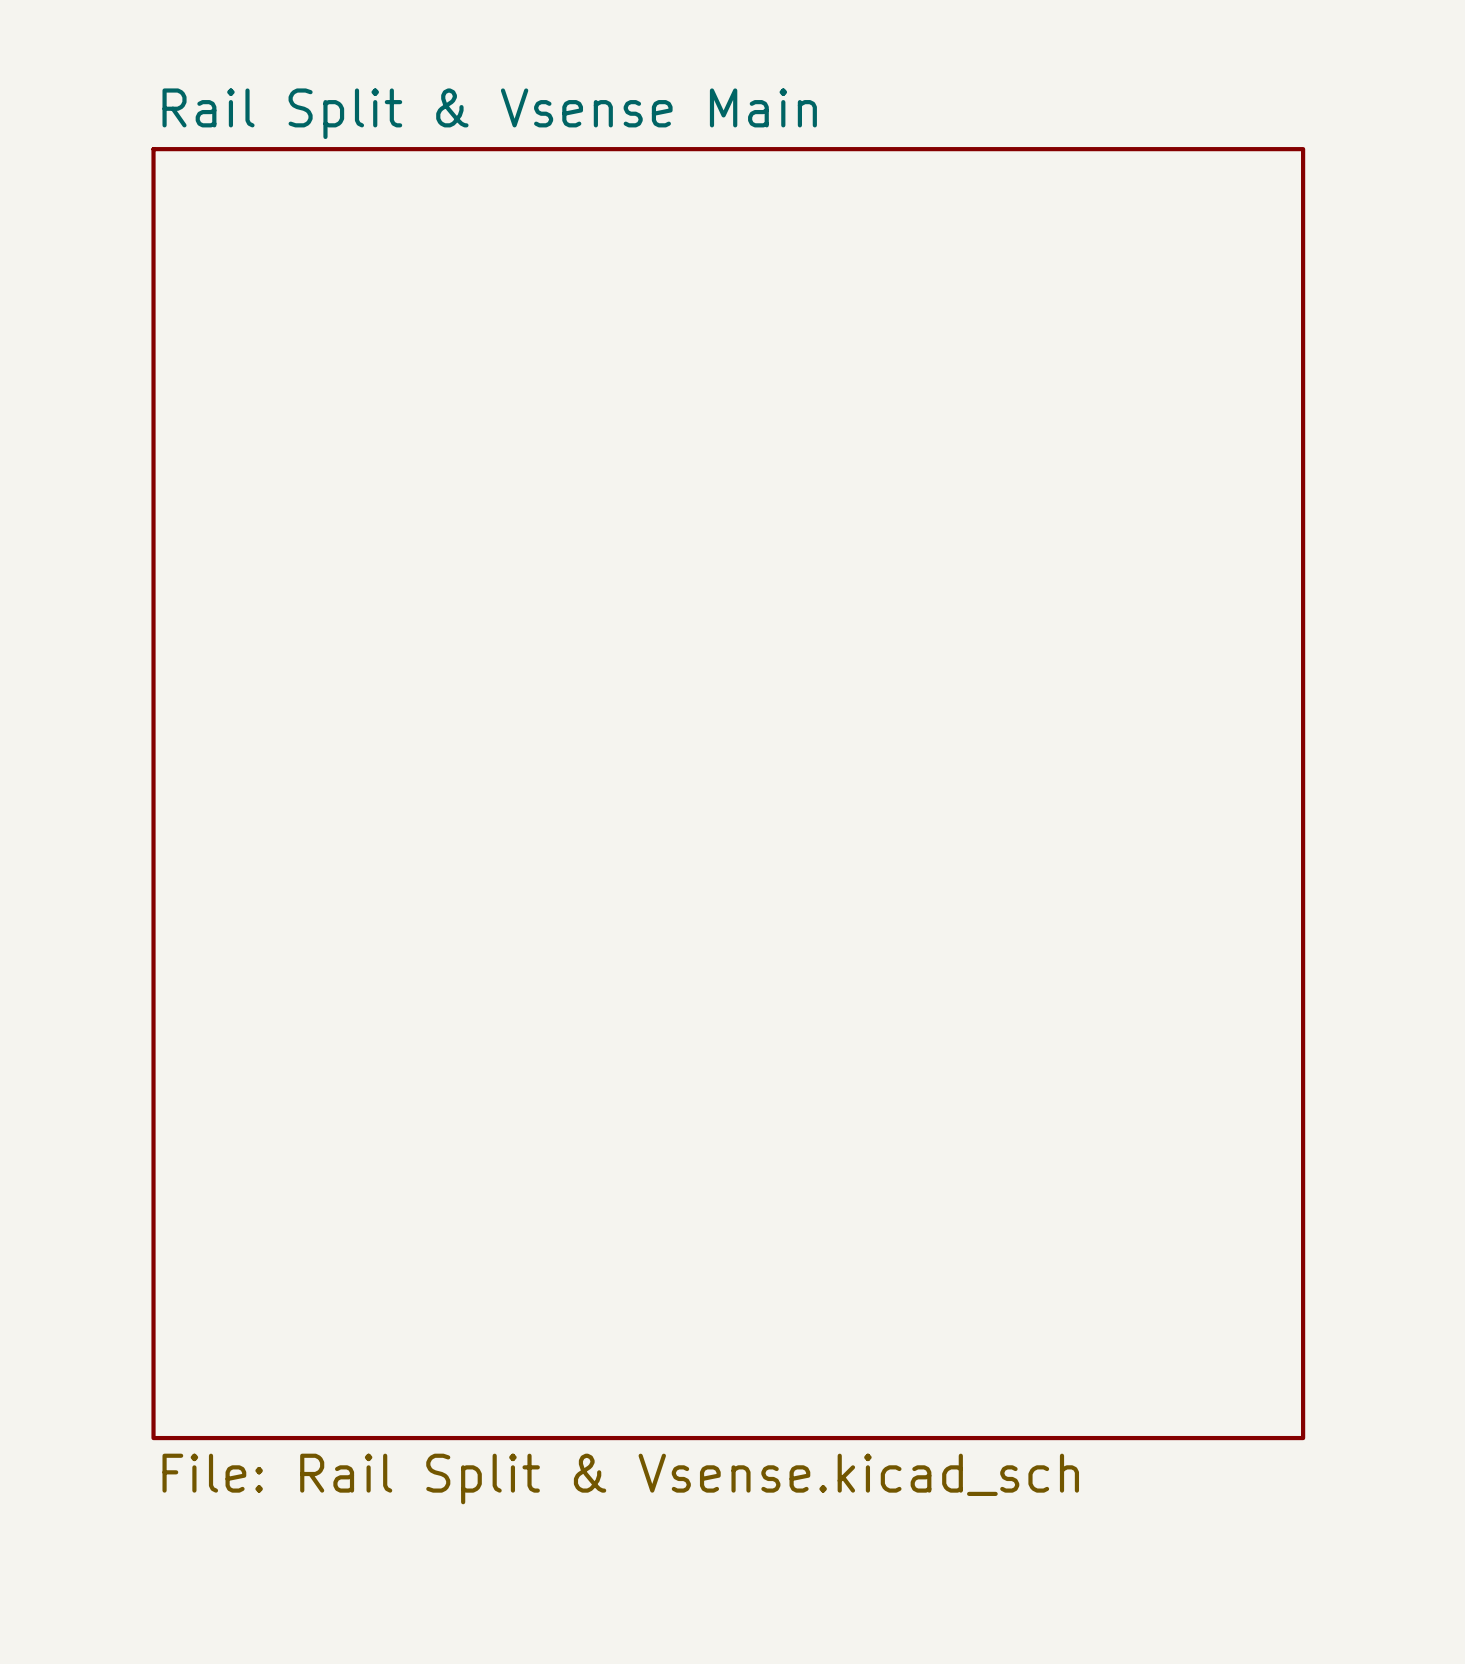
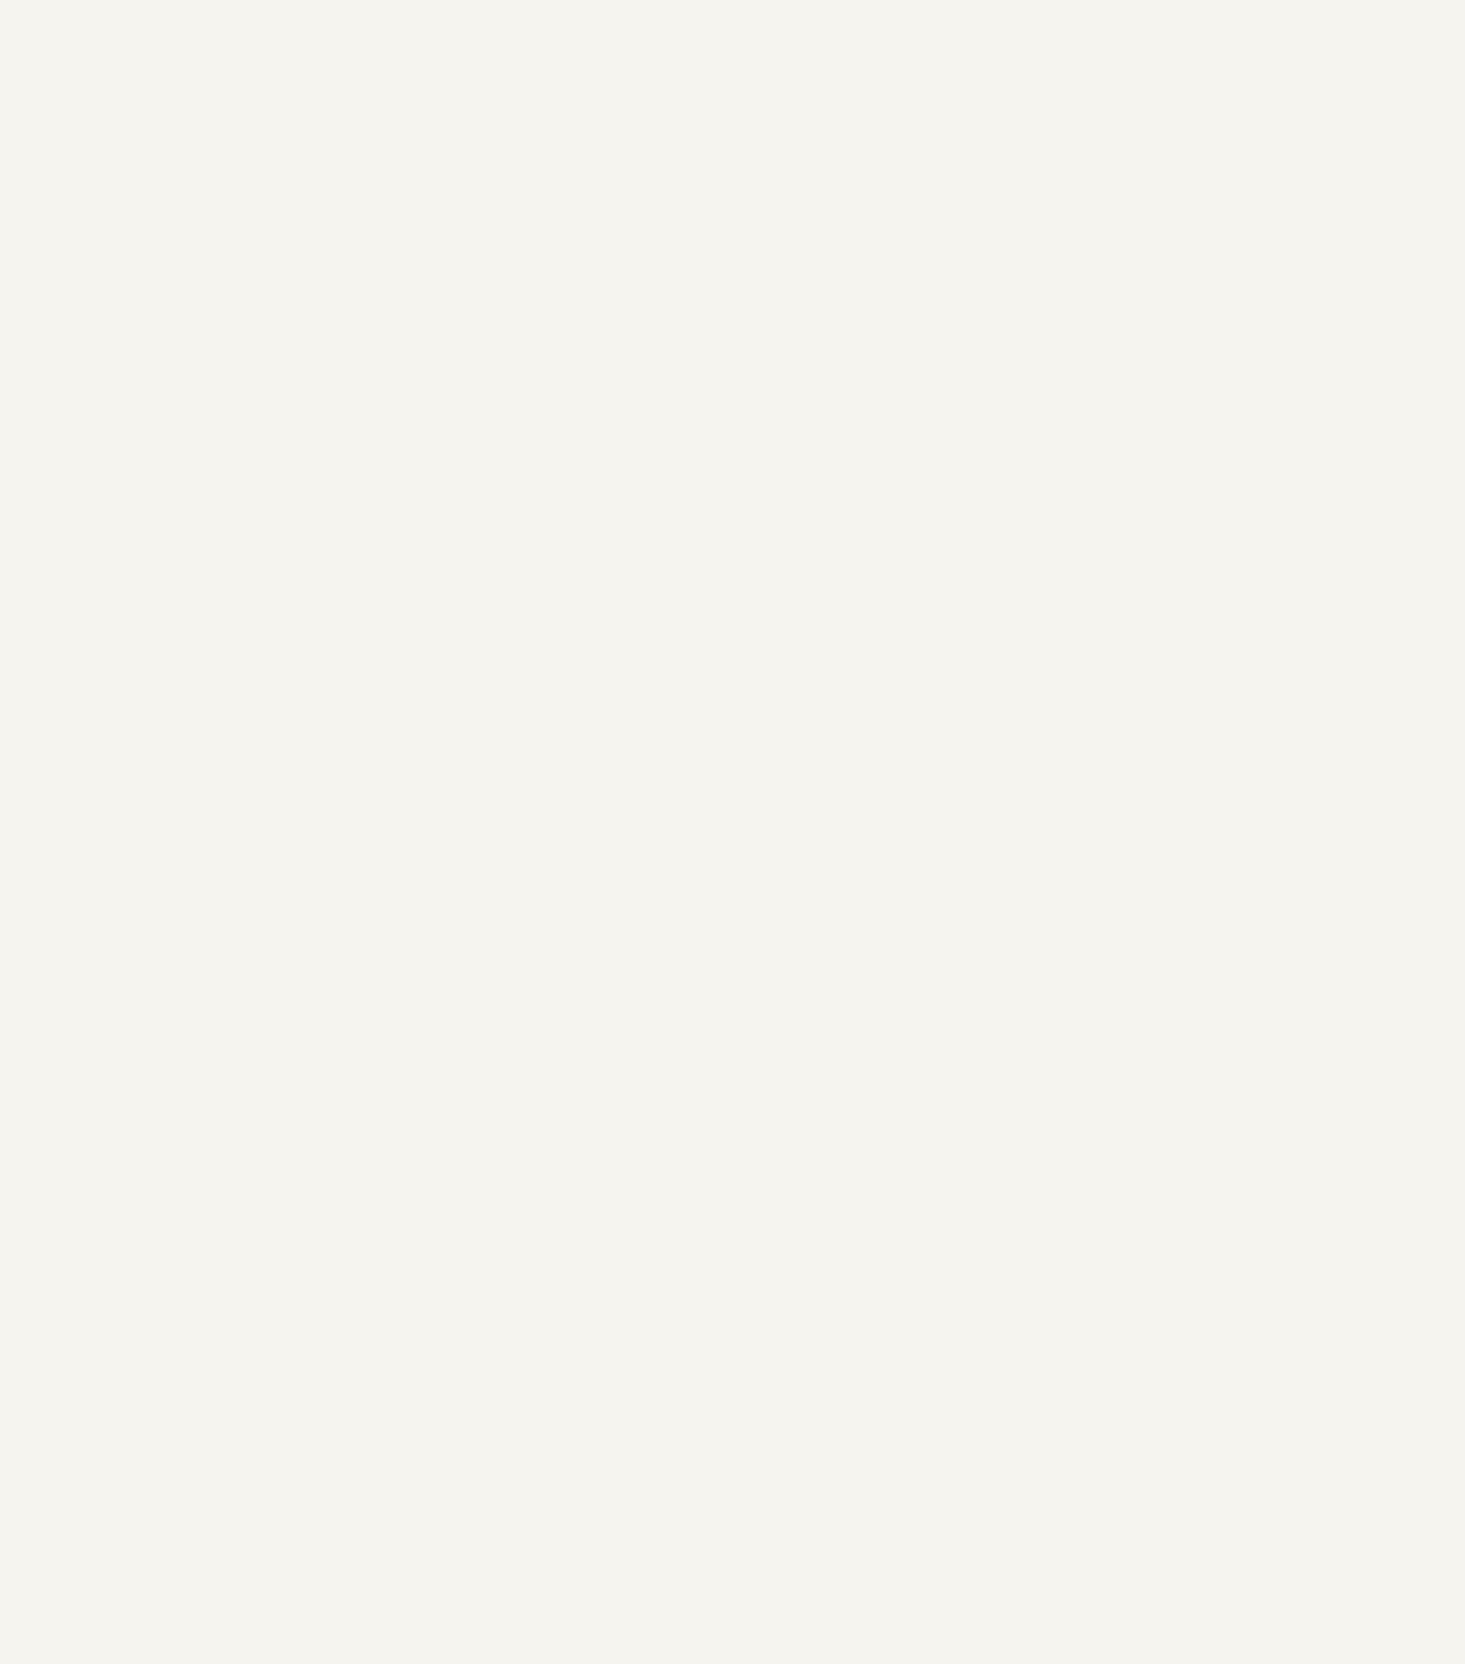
sheet Rail Split & Vsense Main: File: Rail Split & Vsense.kicad_sch (728, 793) -> none

